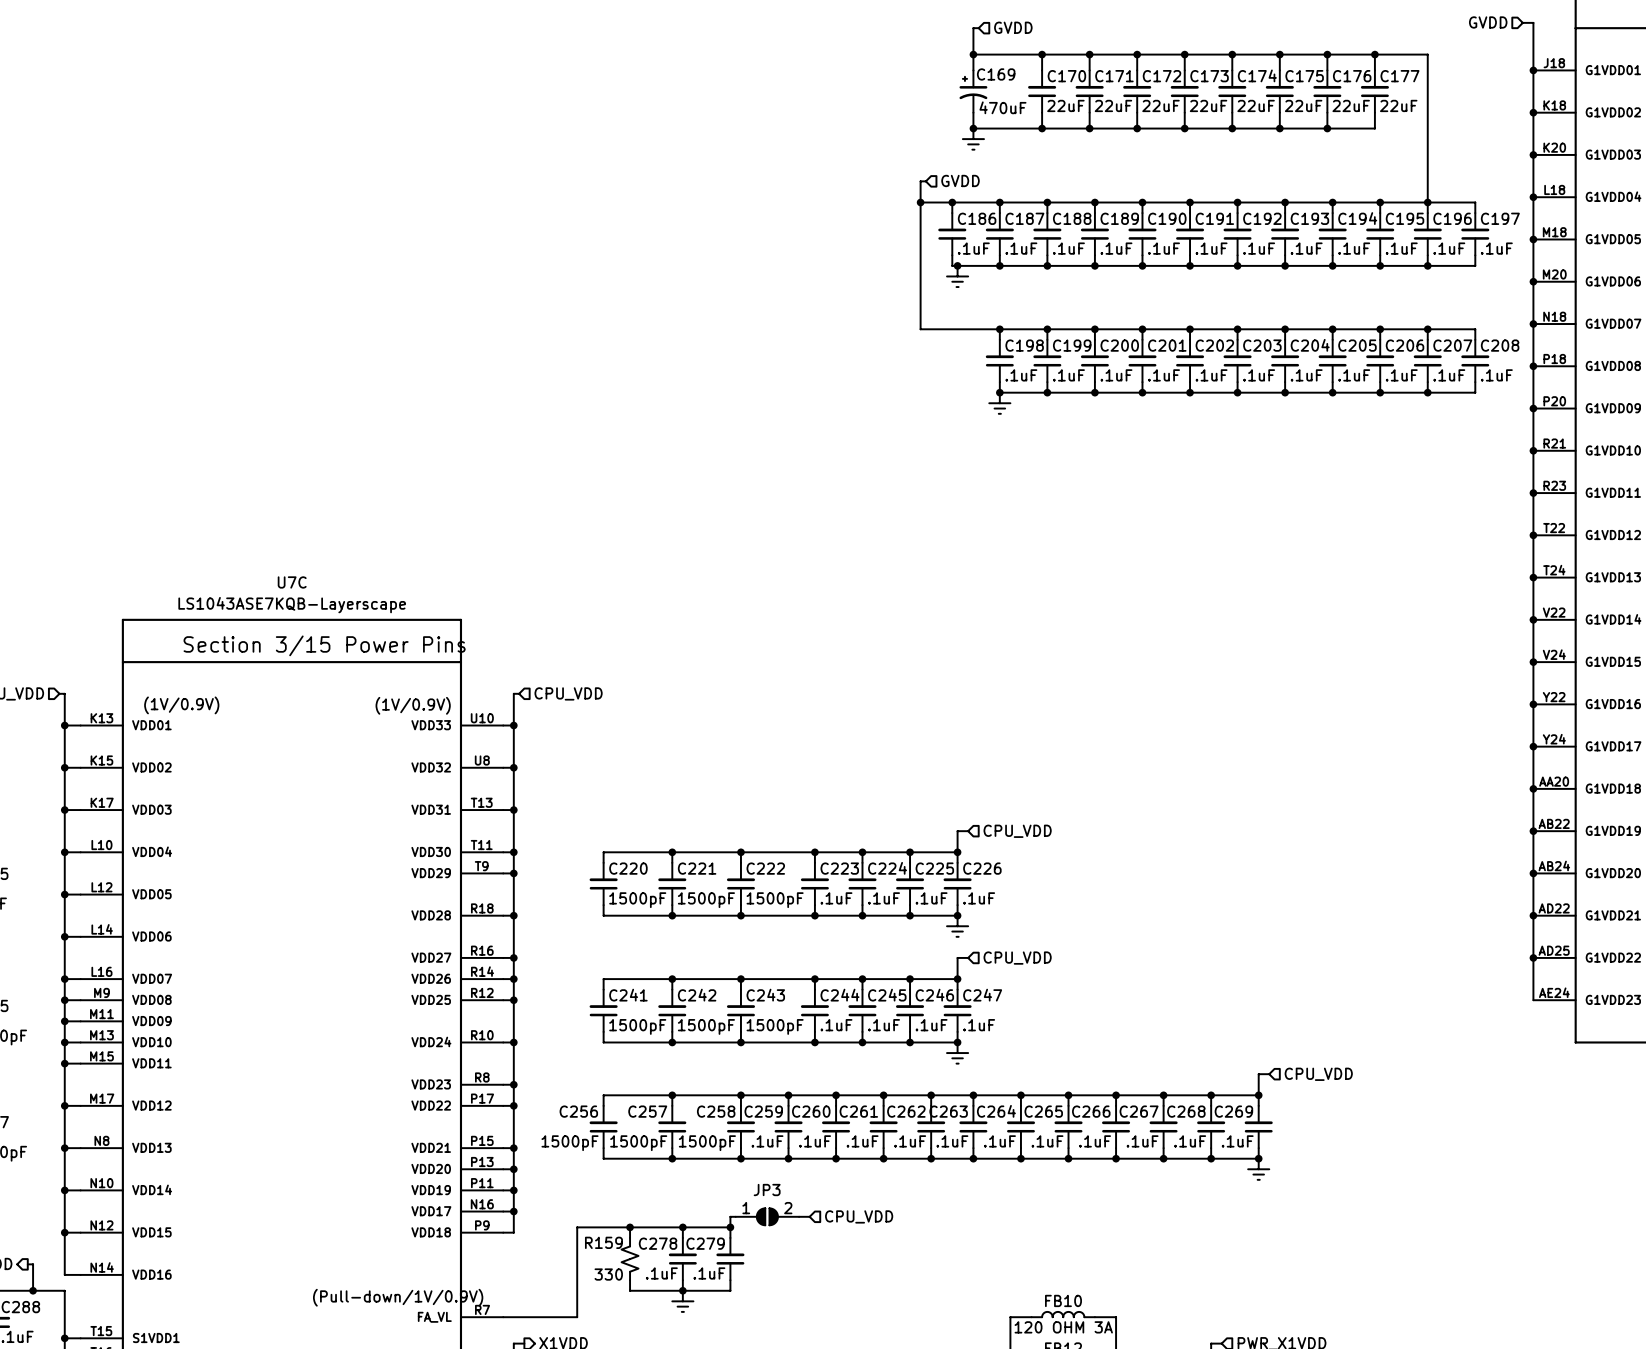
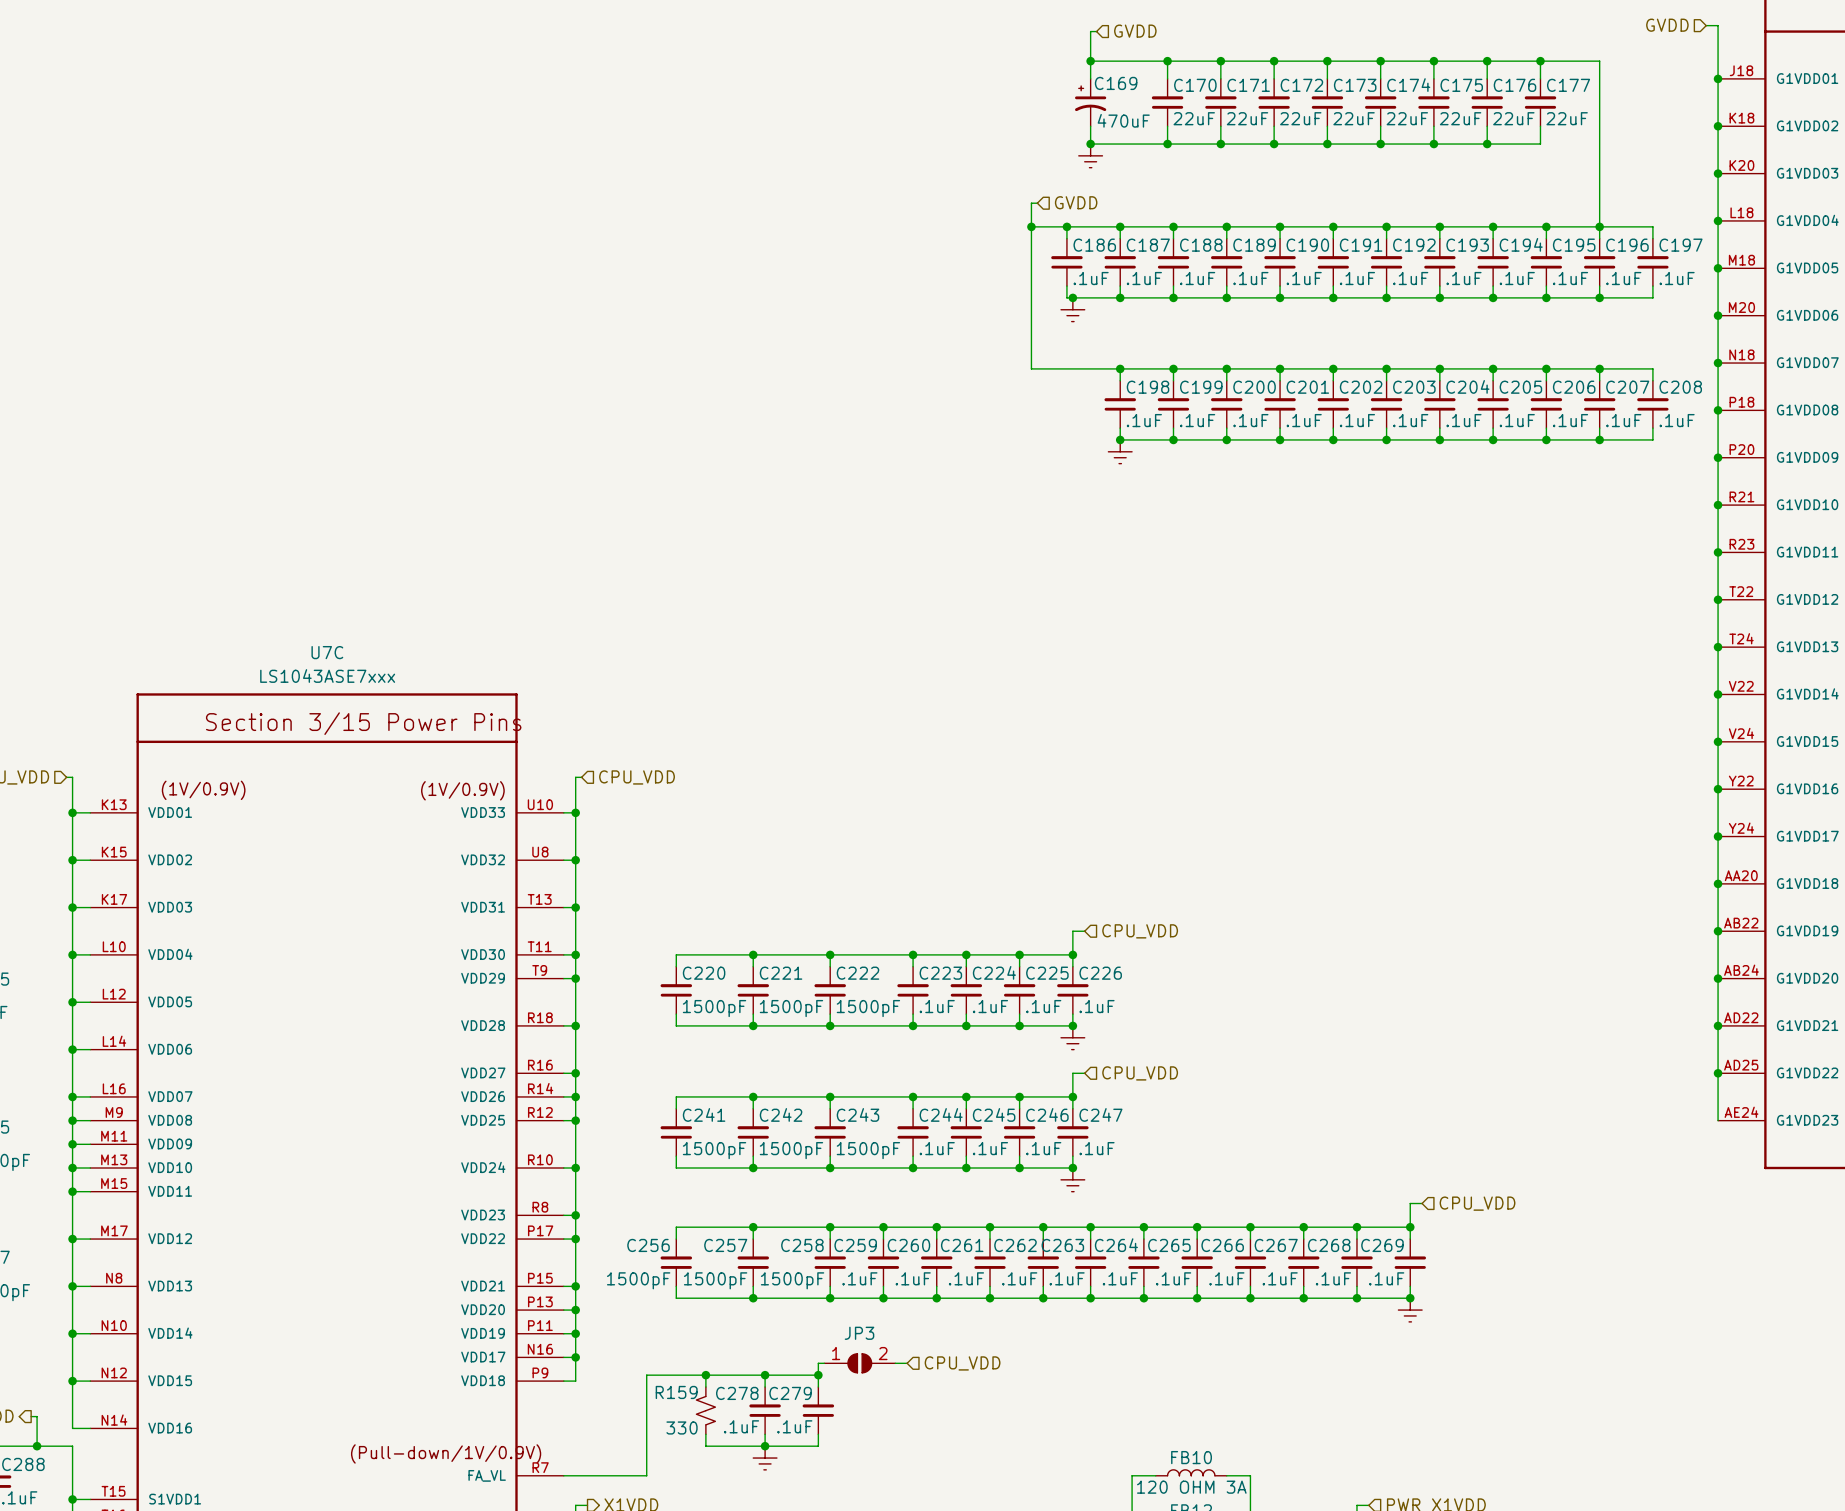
U7C value: LS1043ASE7KQB-Layerscape (292, 605) -> LS1043ASE7xxx (327, 676)

